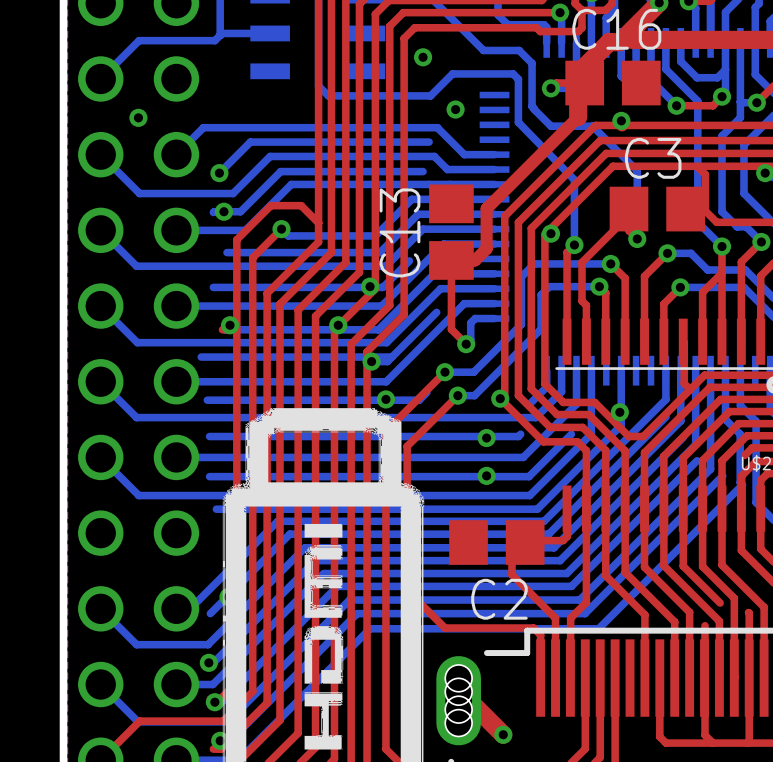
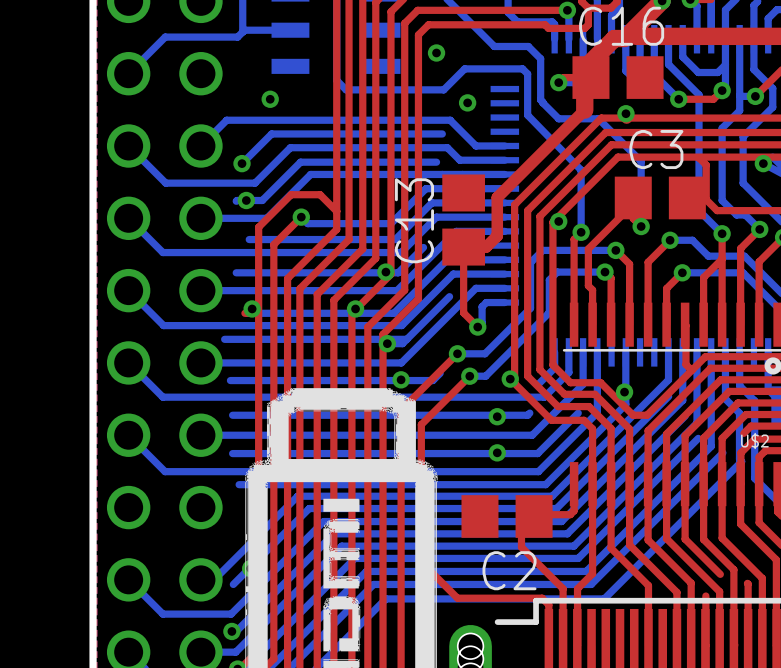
via: none -> (270, 99)
via: (138, 117) -> none

